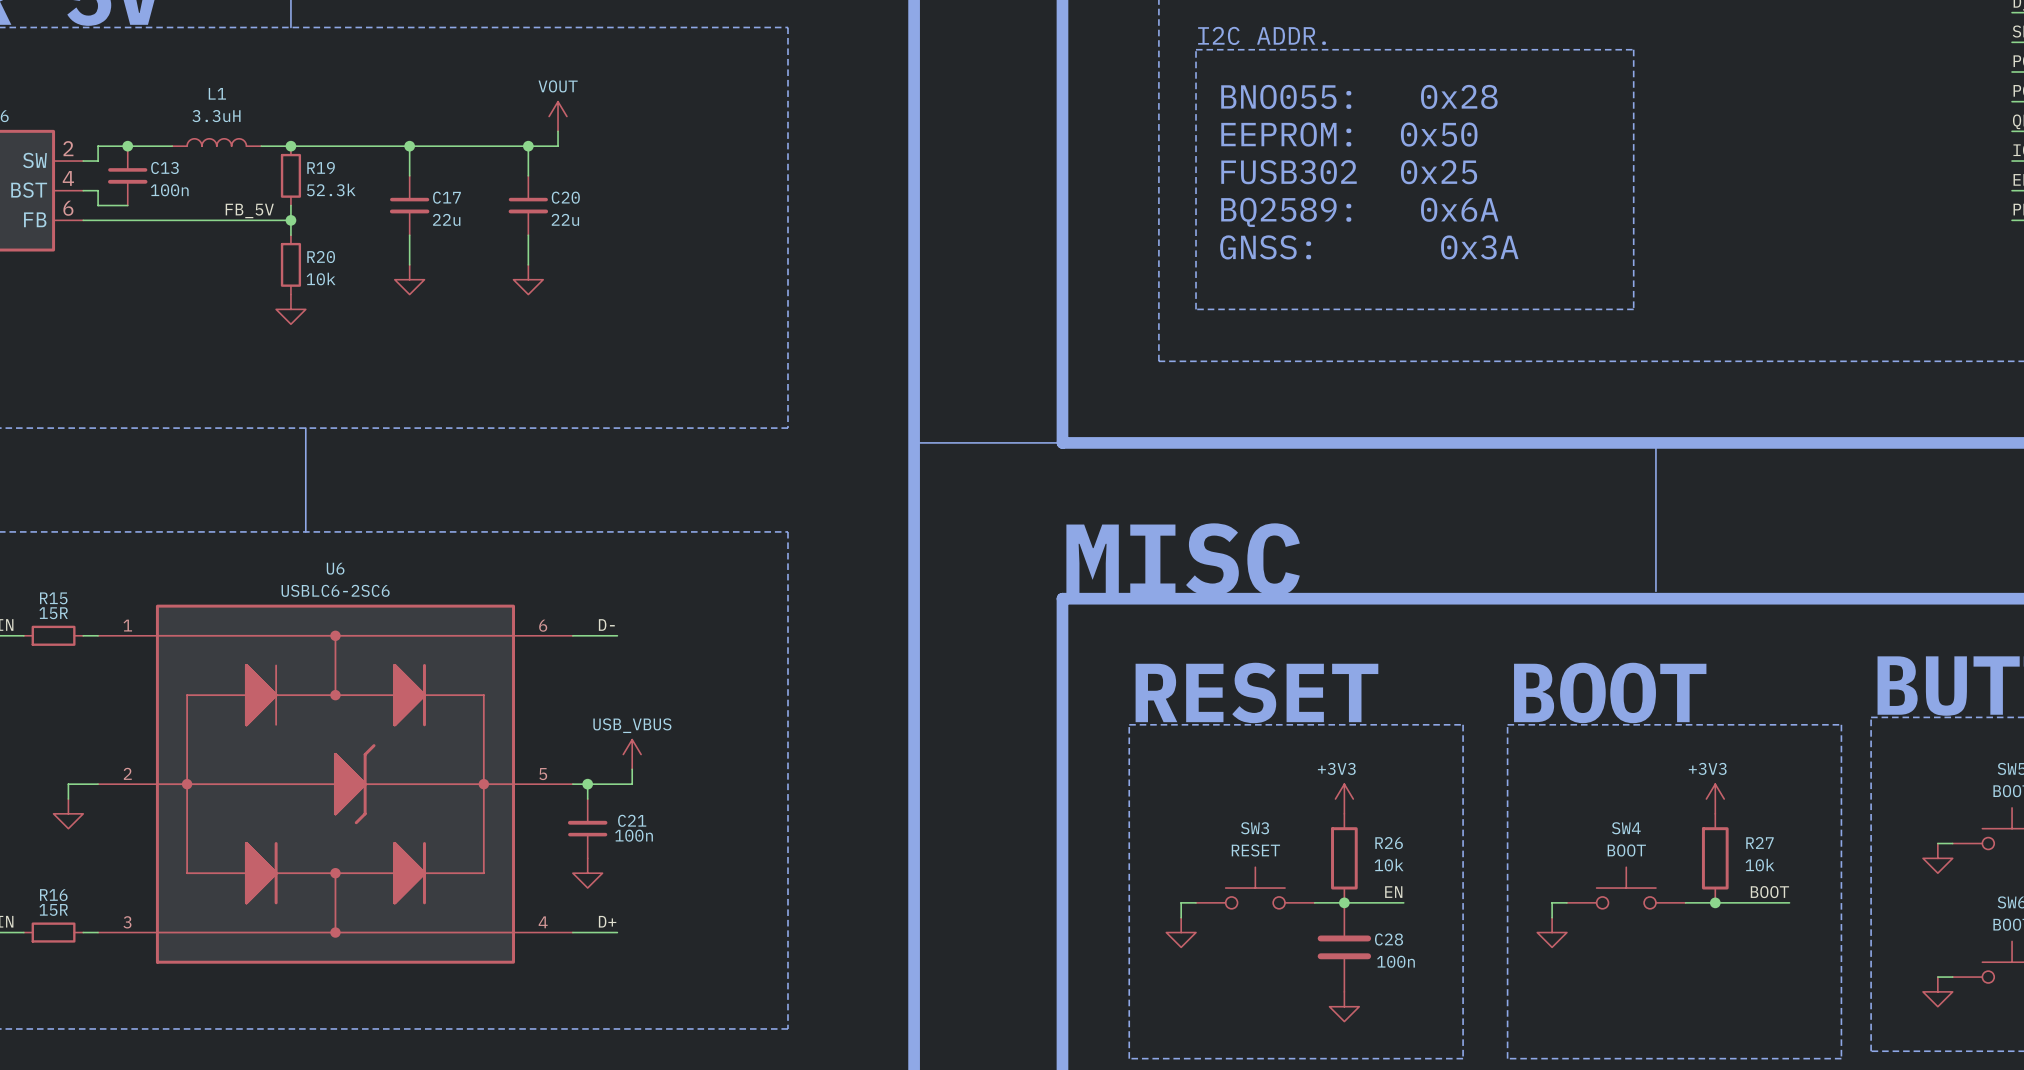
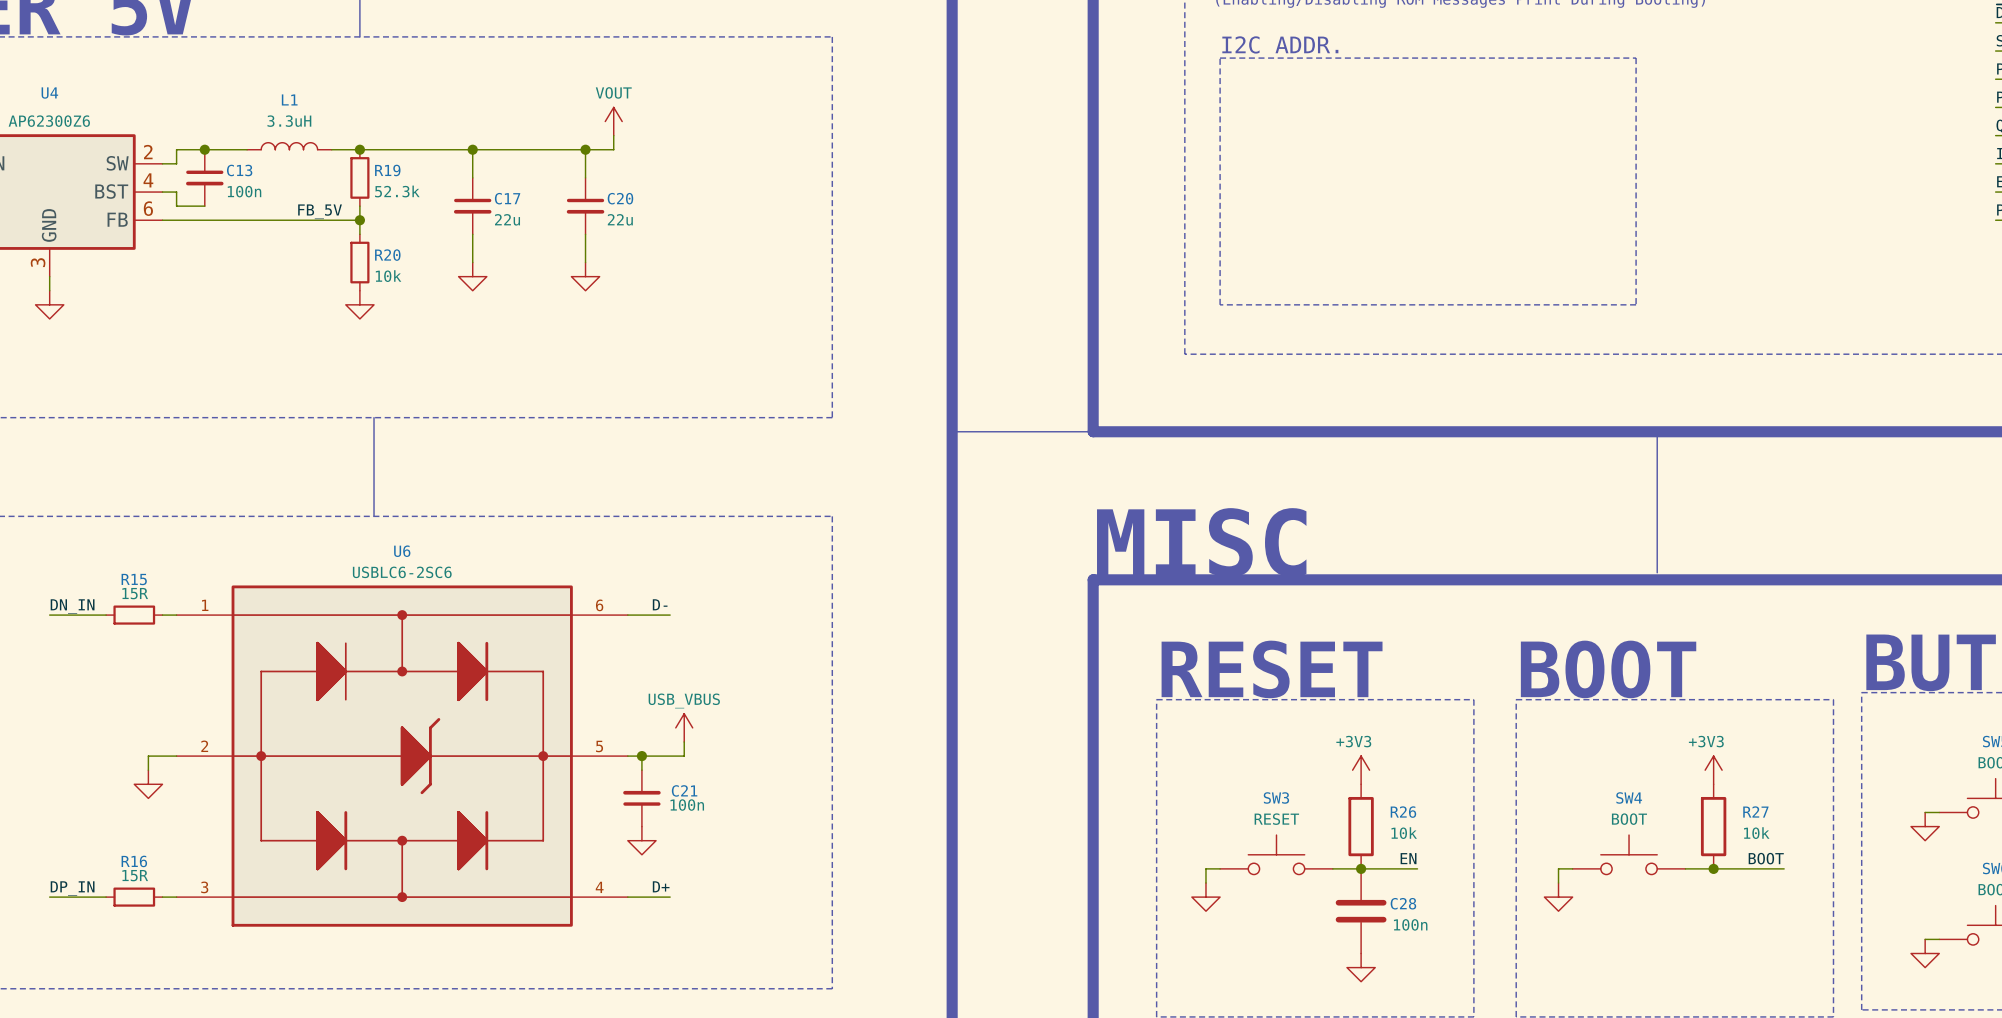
text: BNO055: 0x28 (1359, 96) -> none
text: EEPROM: 0x50 (1349, 134) -> none
text: FUSB302 0x25 (1349, 172) -> none
text: BQ2589: 0x6A (1359, 212) -> none
text: GNSS: 0x3A (1369, 247) -> none

